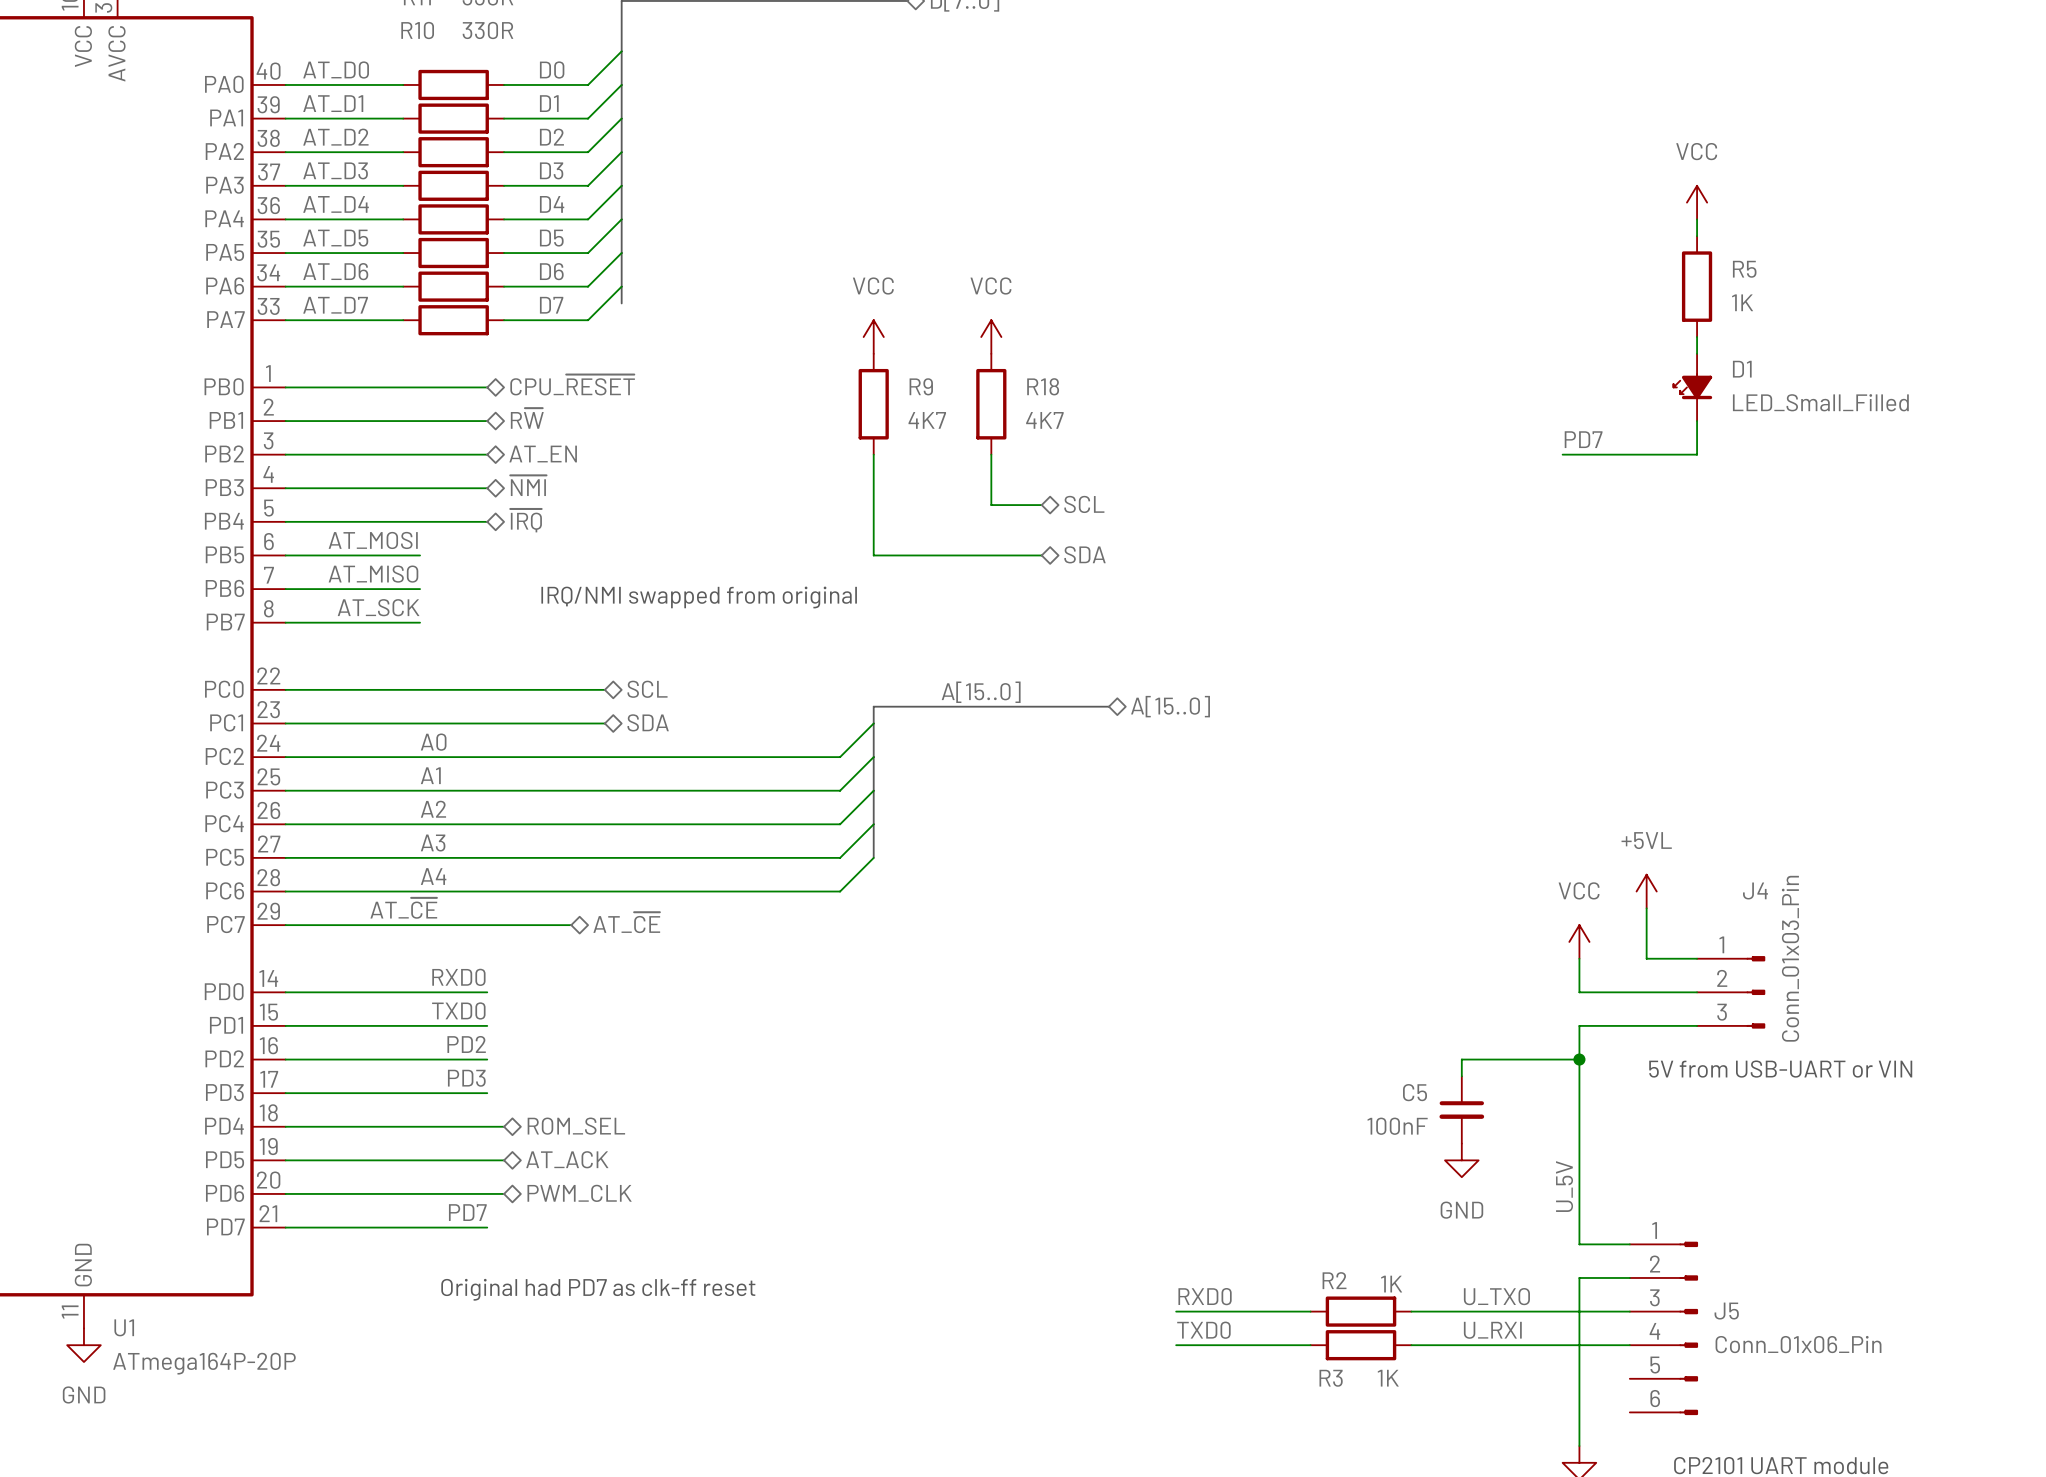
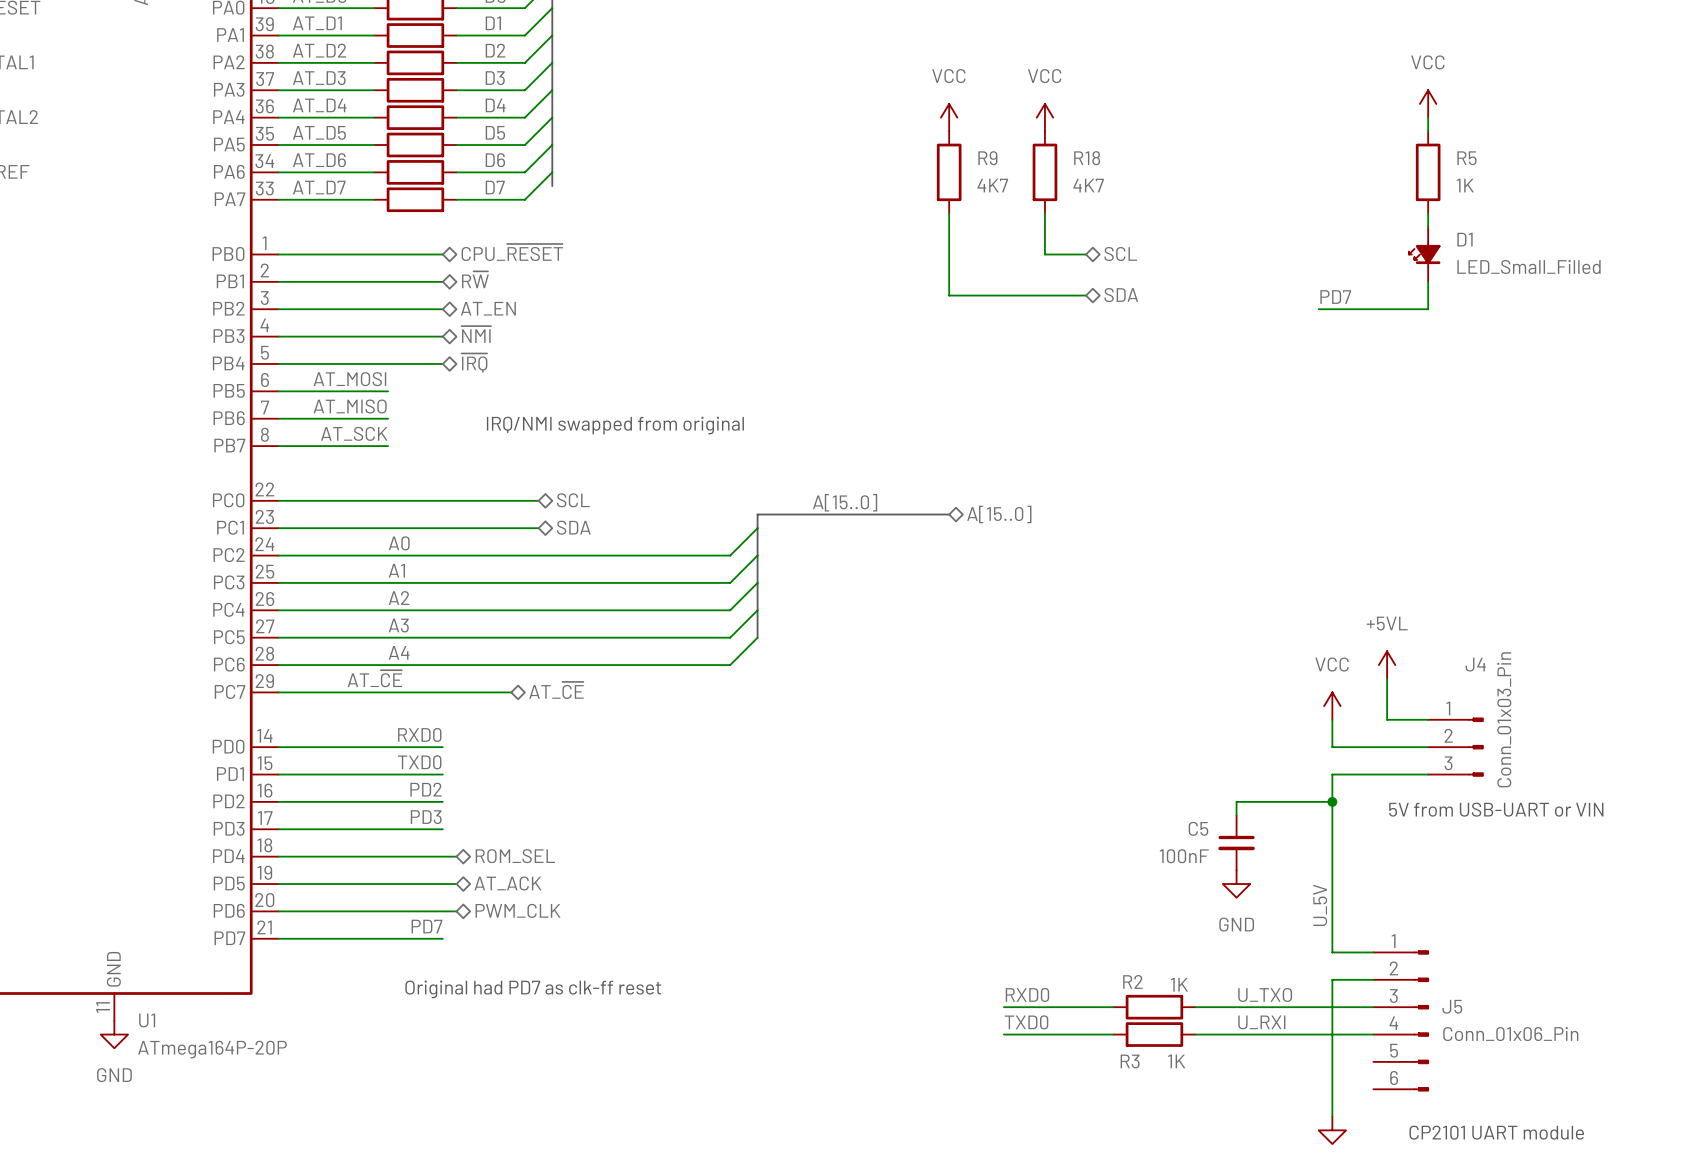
power symbol: none -> VCC (949, 117)
power symbol: none -> VCC (1044, 117)
power symbol: VCC (873, 337) -> none
power symbol: VCC (991, 337) -> none
R9 position: (873, 404) -> (949, 172)
R18 position: (991, 404) -> (1044, 172)
wire: (873, 454) (873, 555) (1041, 555) -> (949, 213) (949, 295) (1086, 295)
wire: (991, 454) (991, 505) (1041, 505) -> (1044, 213) (1044, 254) (1086, 254)
hierarchical label position: SCL (1084, 504) -> SCL (1120, 253)
hierarchical label position: SDA (1084, 554) -> SDA (1121, 295)

